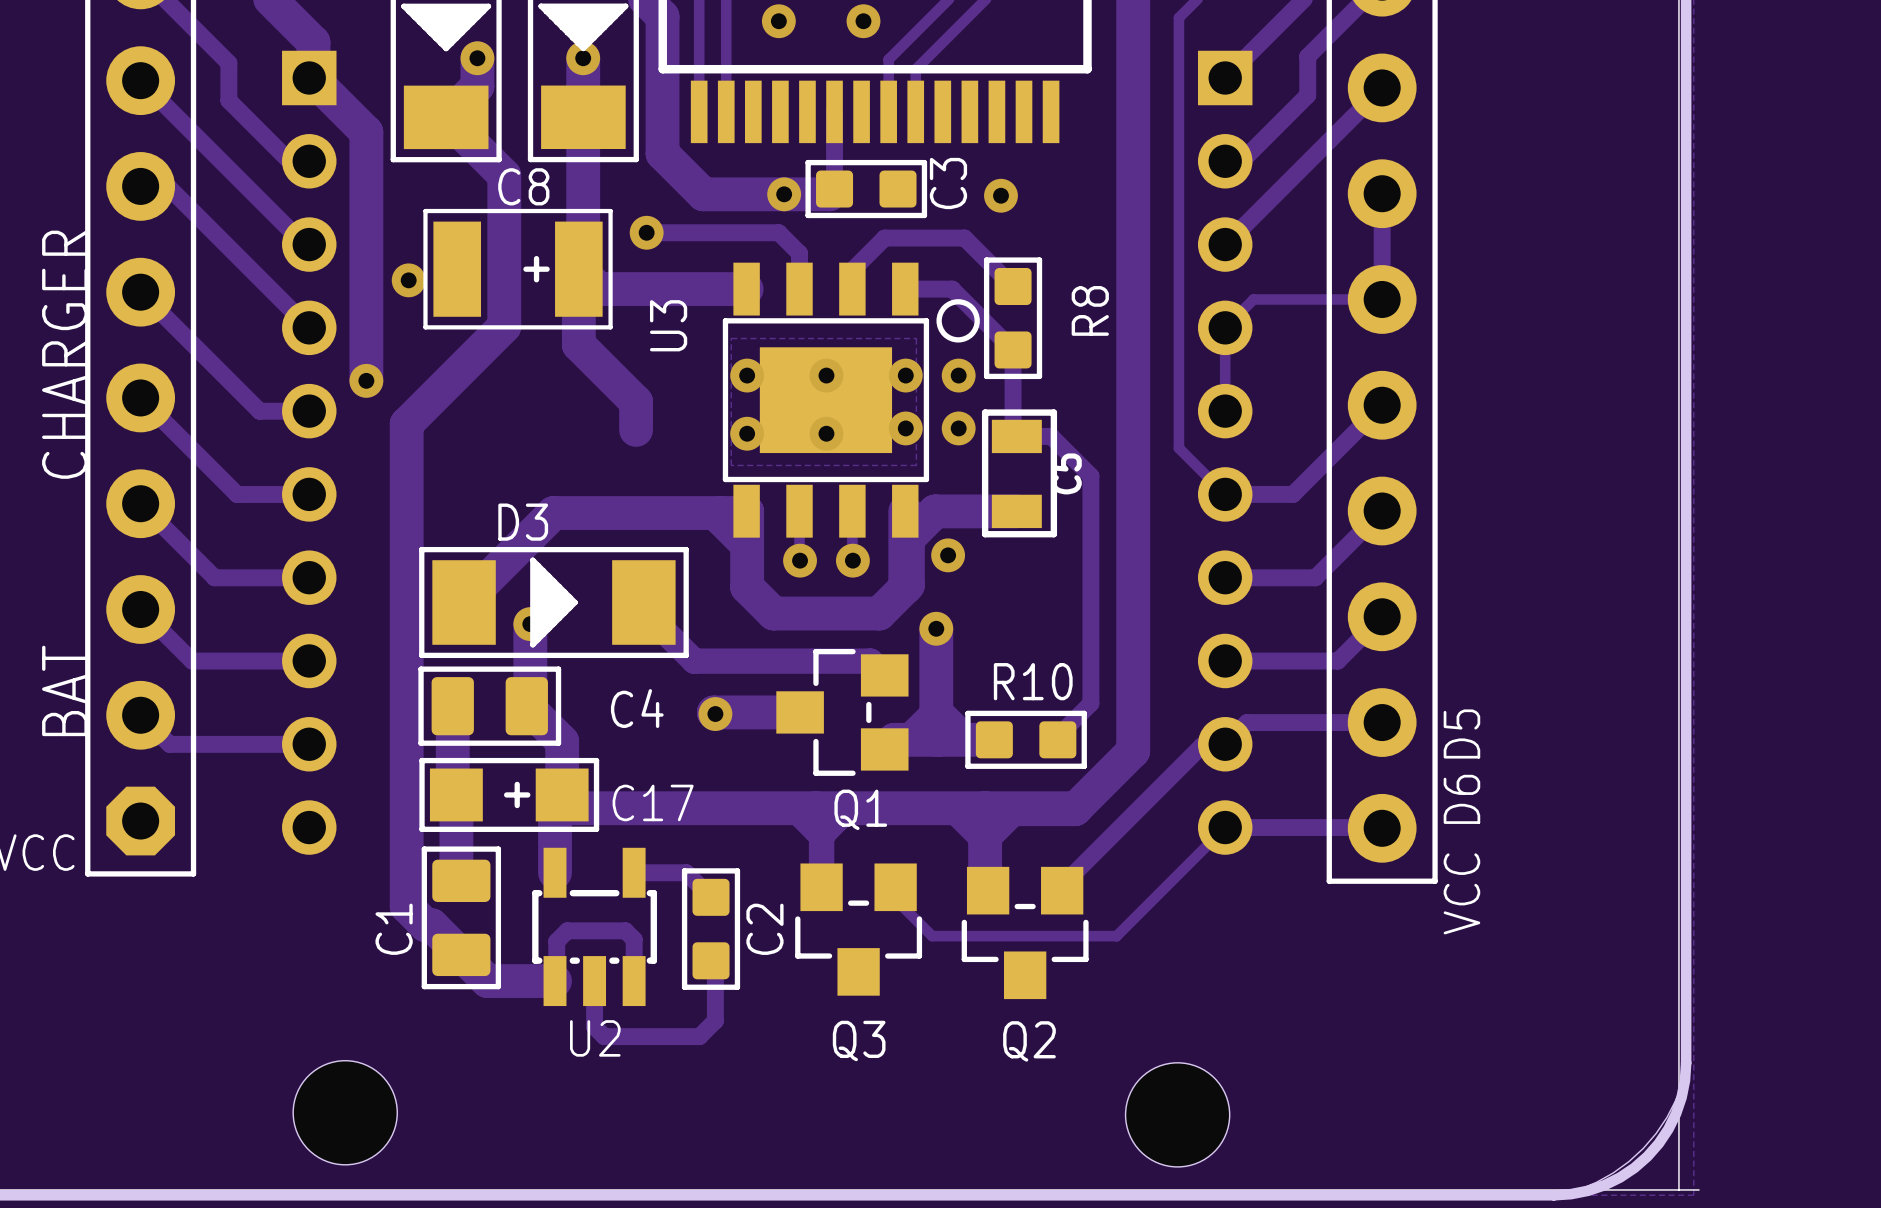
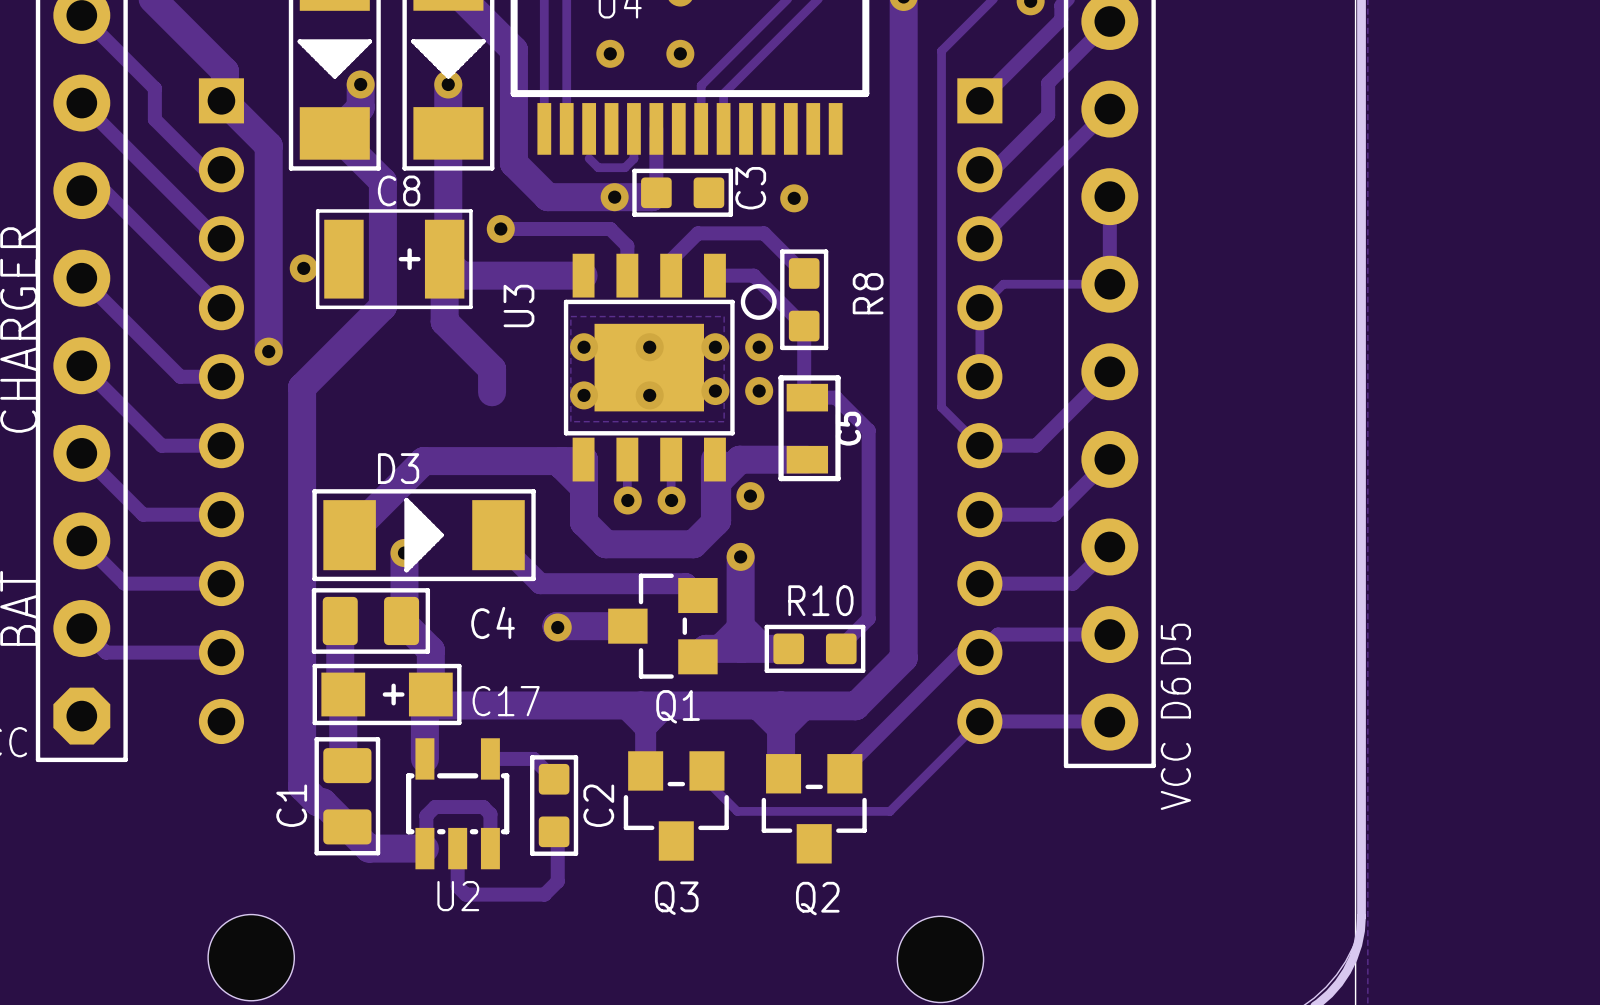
track: none -> (633, 128) (633, 158) (625, 167) (598, 167) (589, 158)

